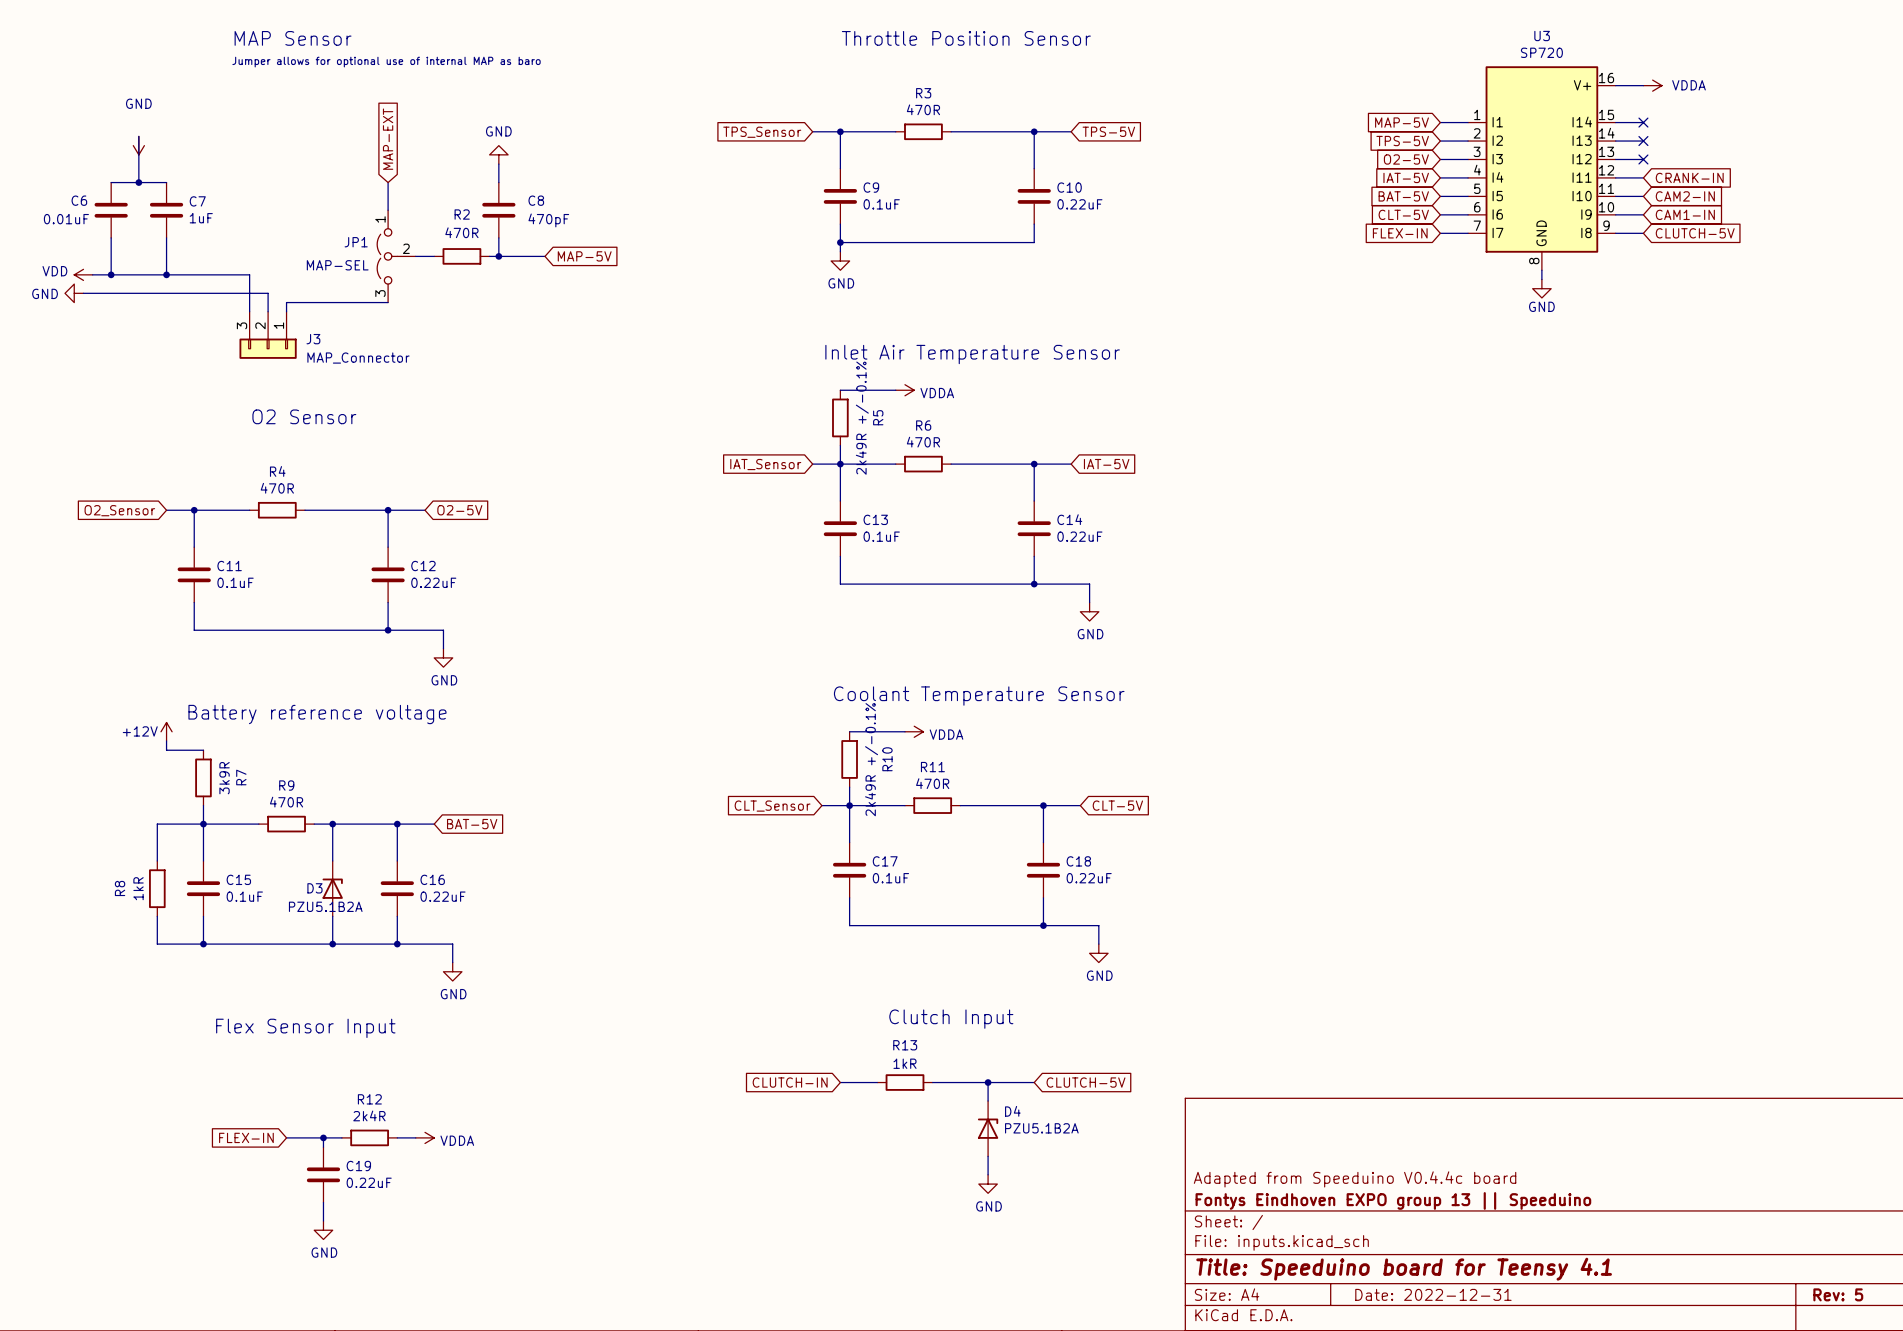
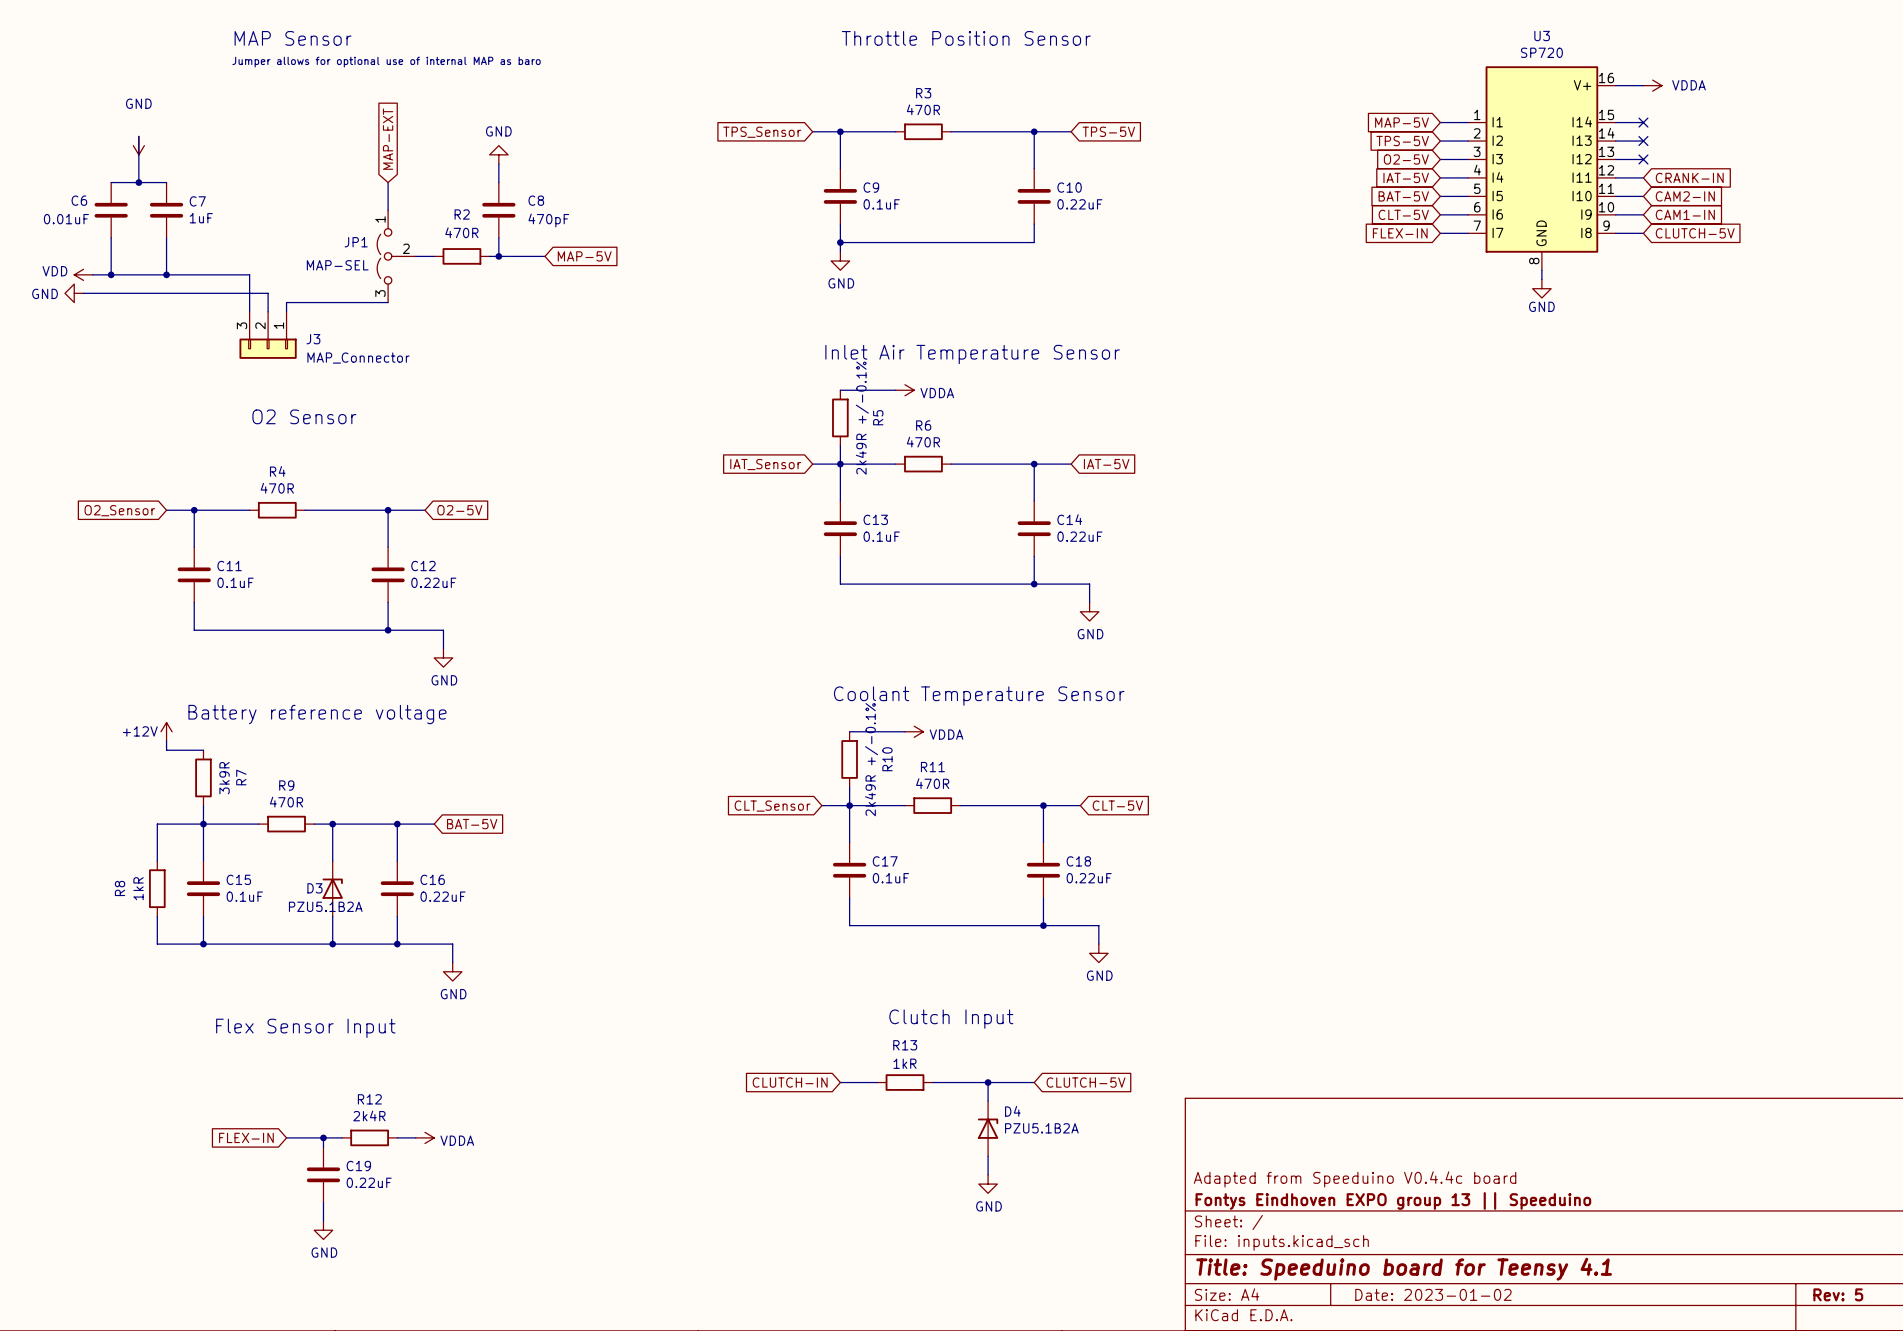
title block: Date: 2022-12-31 (1433, 1294) -> Date: 2023-01-02 (1433, 1294)

